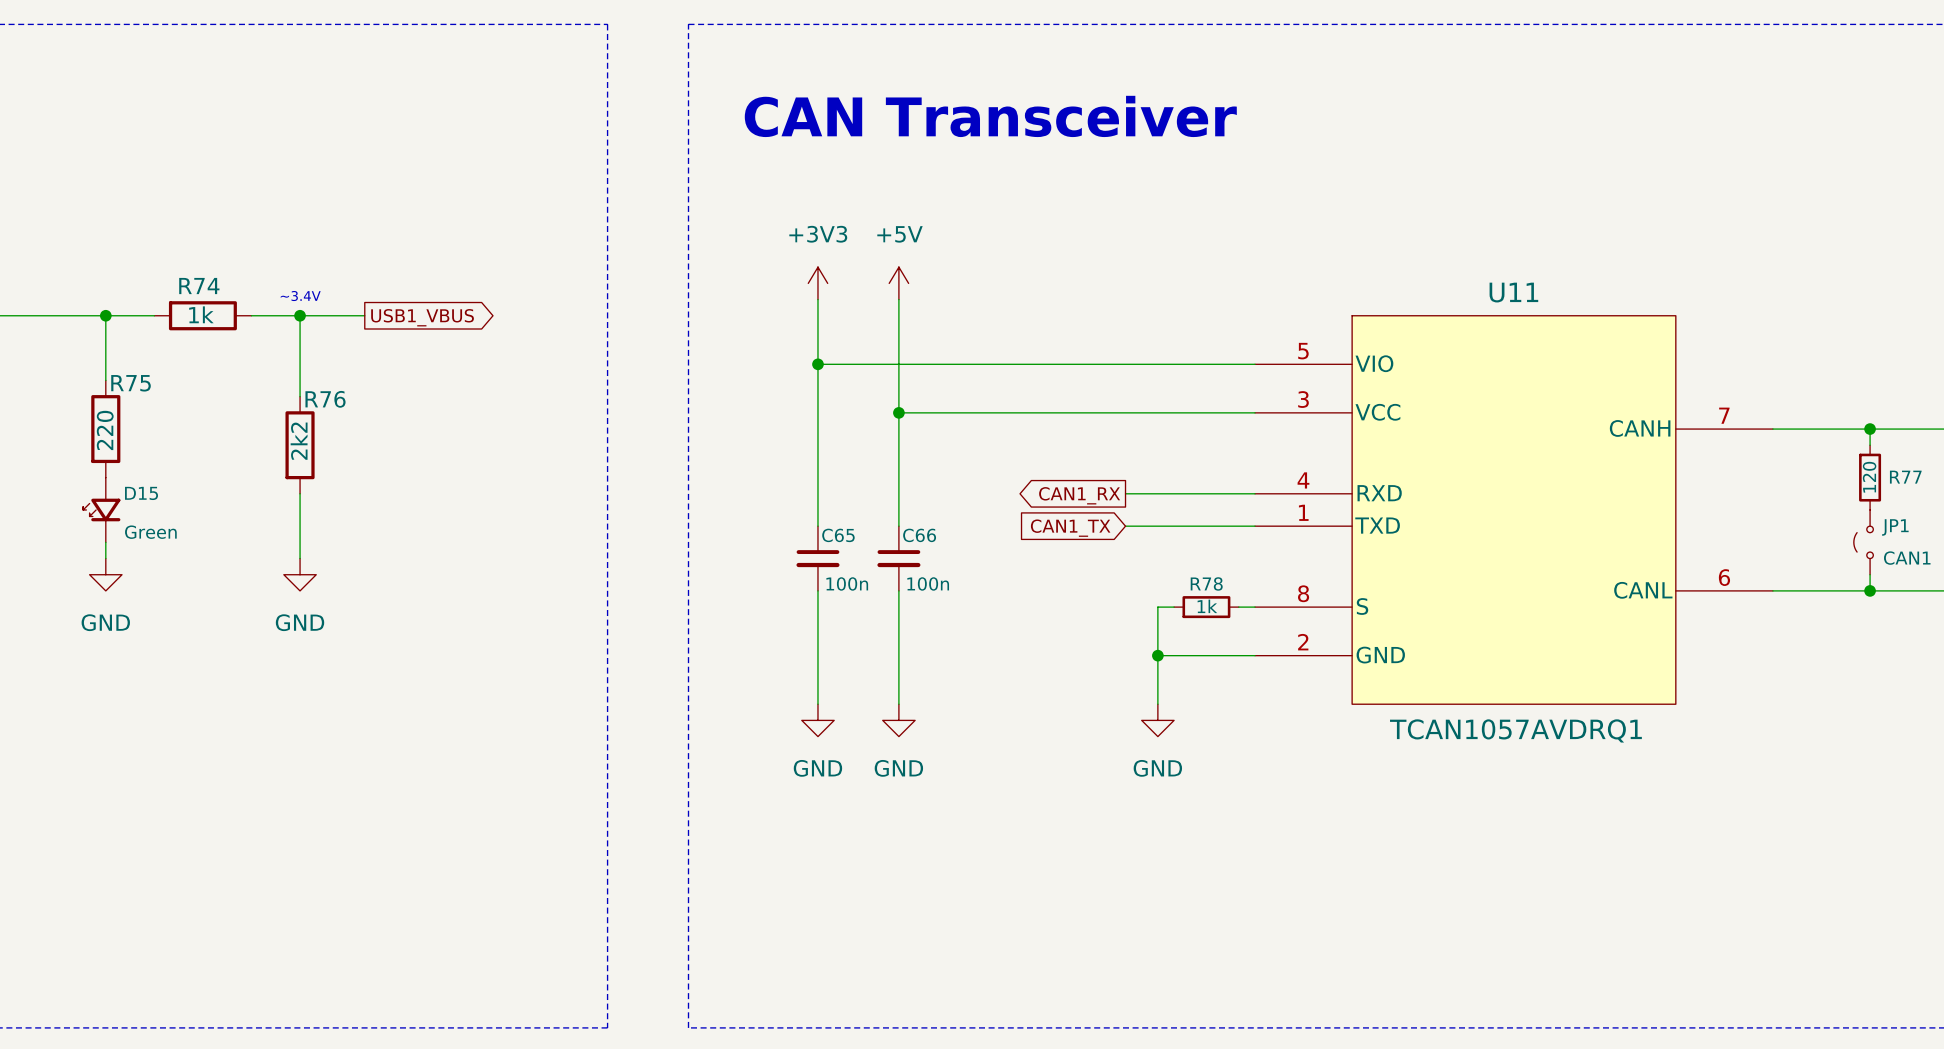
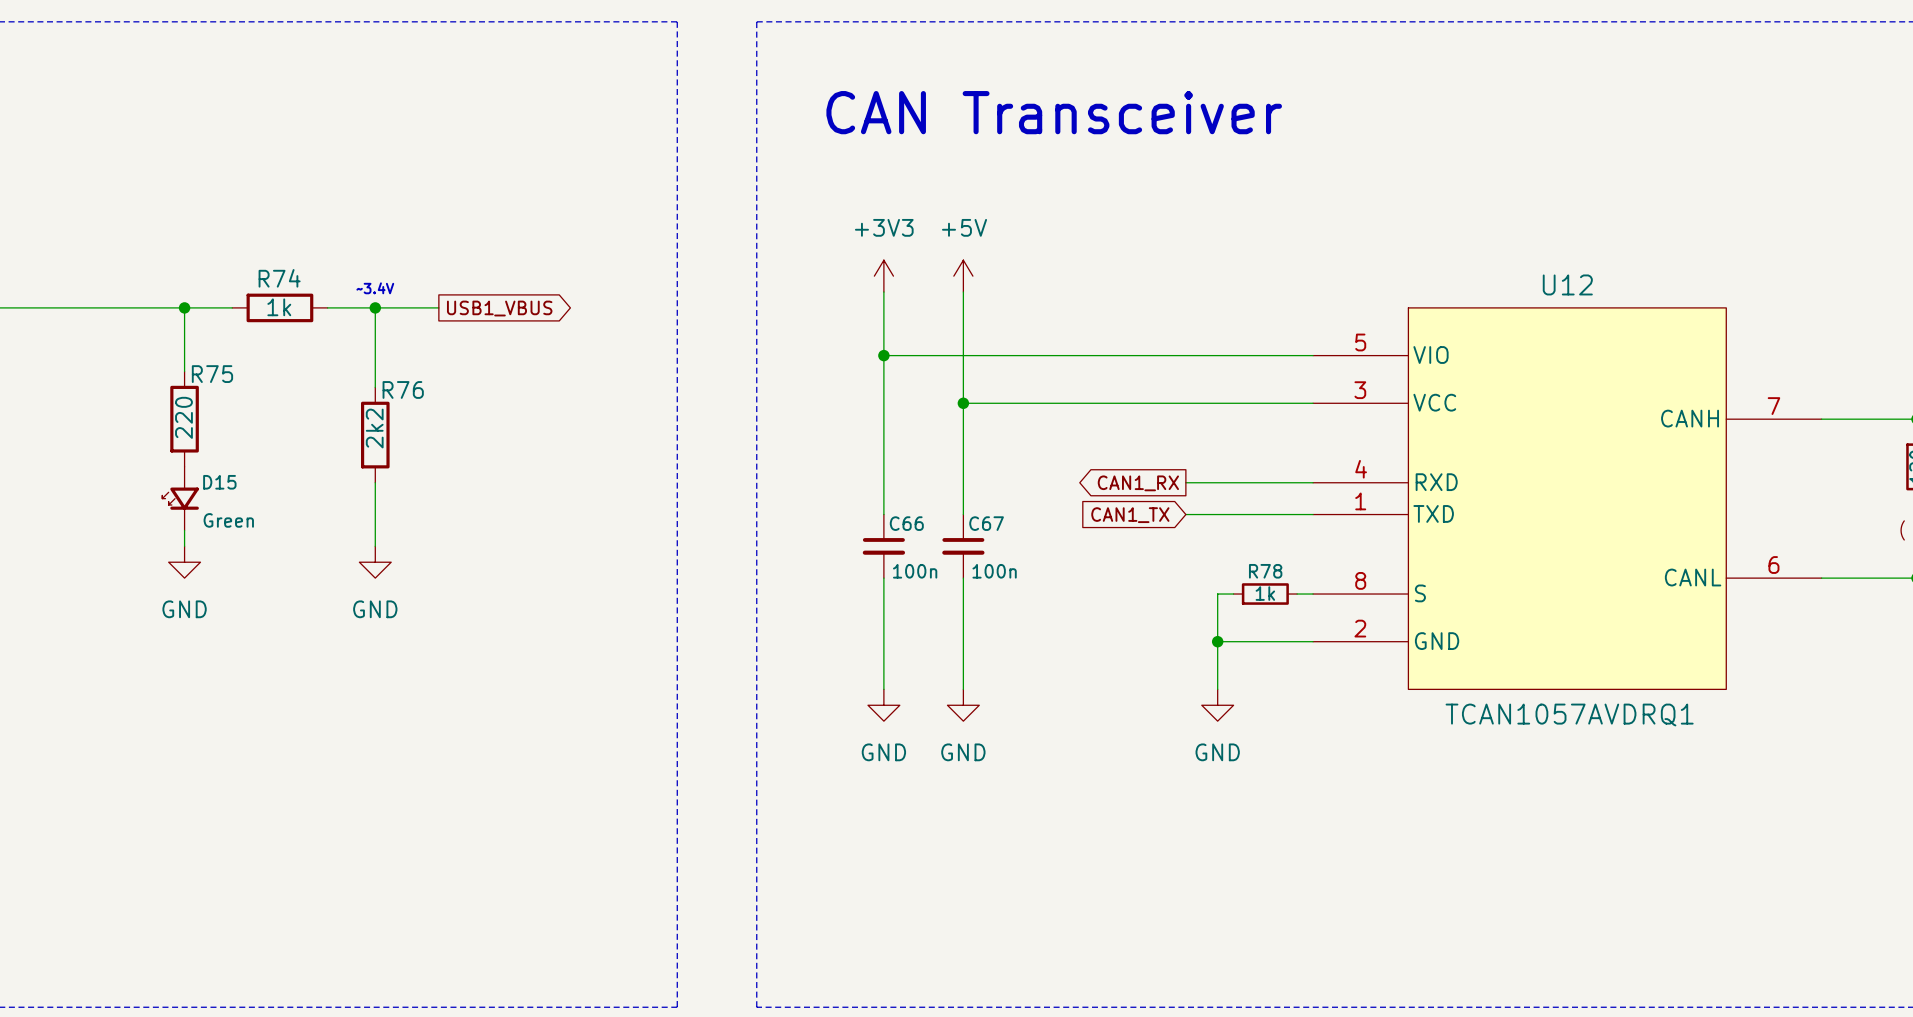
U11 name: U11 (1513, 292) -> U12 (1567, 284)
C65 name: C65 (838, 535) -> C66 (906, 523)
C66 name: C66 (919, 535) -> C67 (986, 523)

